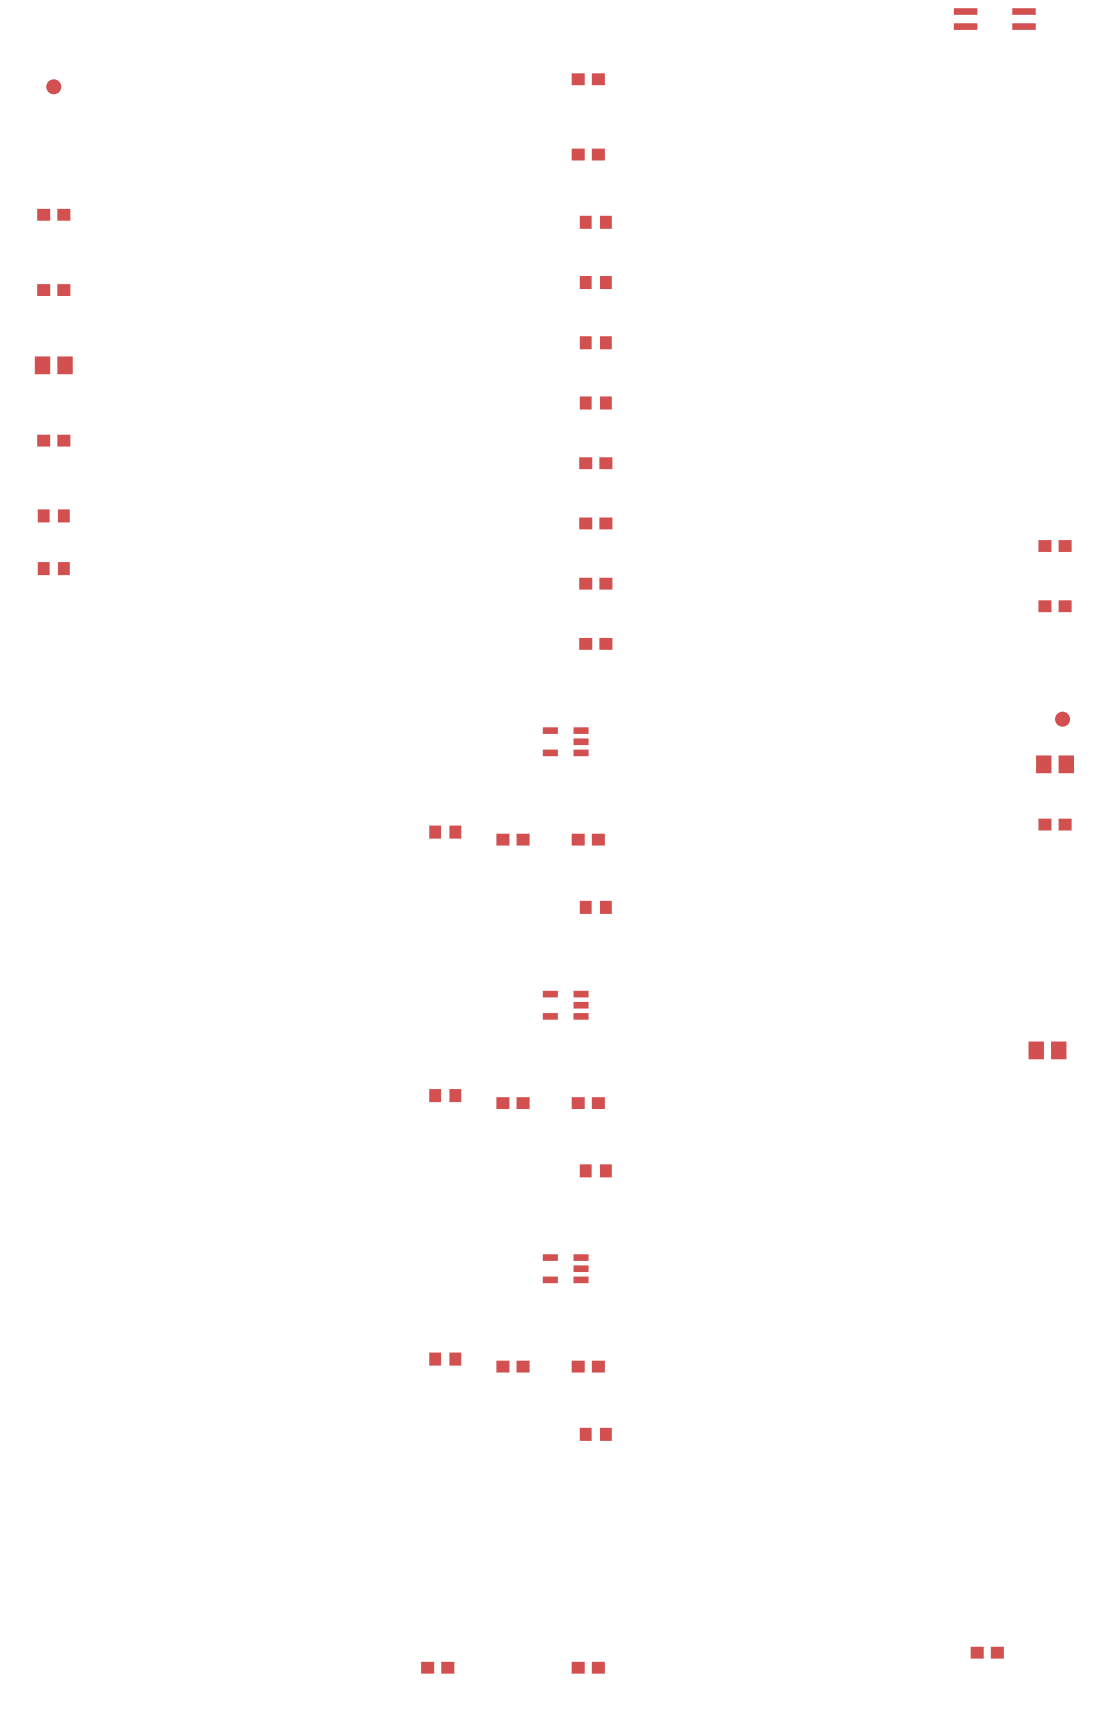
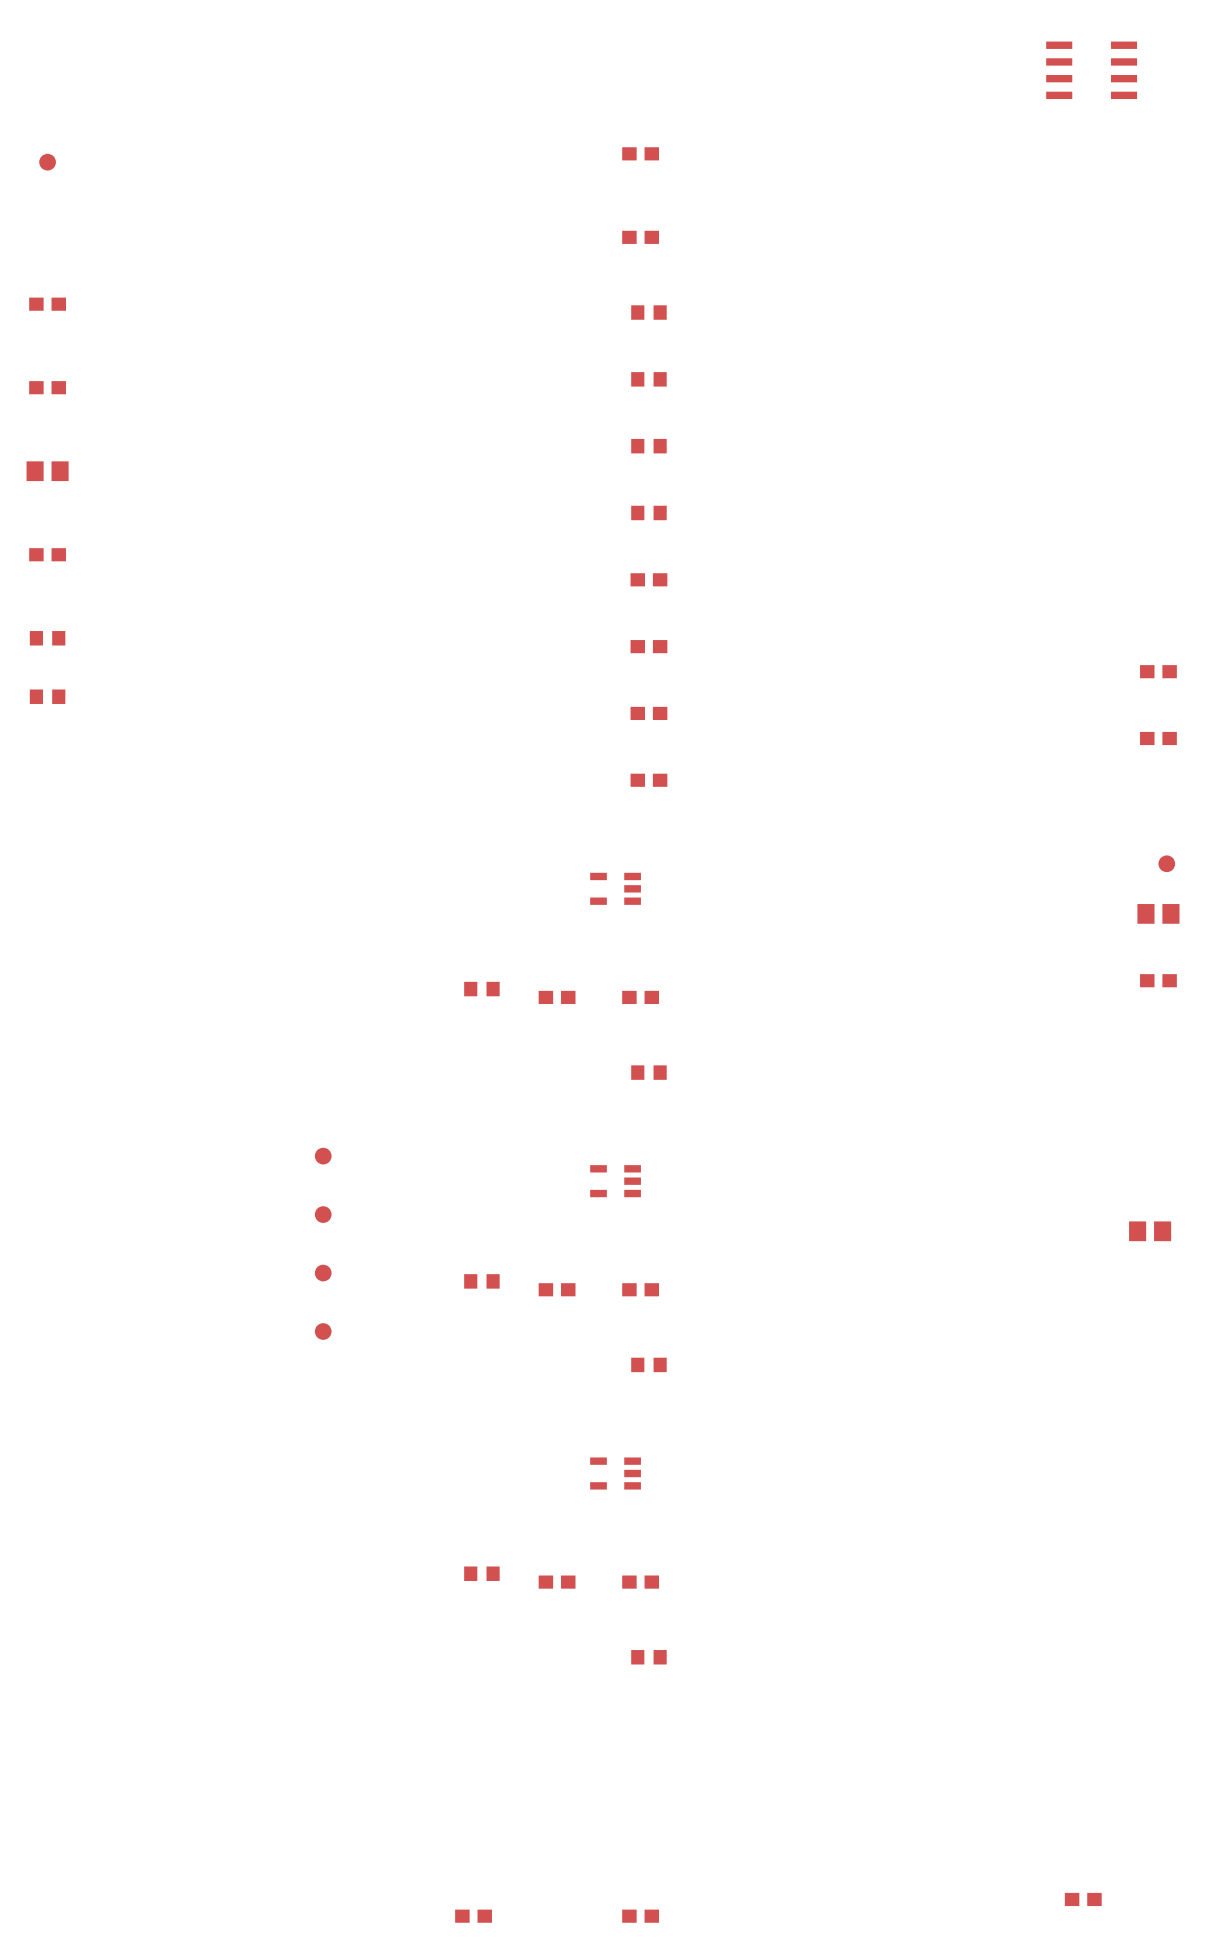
part: none -> (323, 1156)
part: none -> (323, 1214)
part: none -> (323, 1273)
part: none -> (323, 1331)

